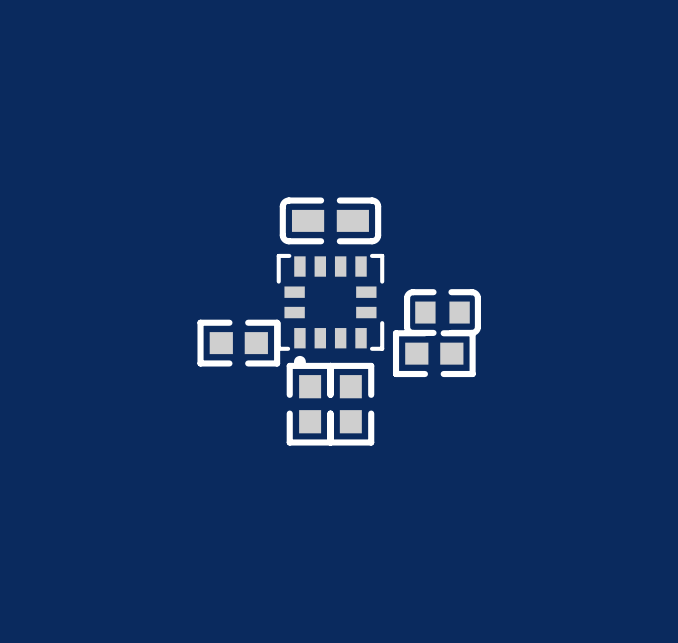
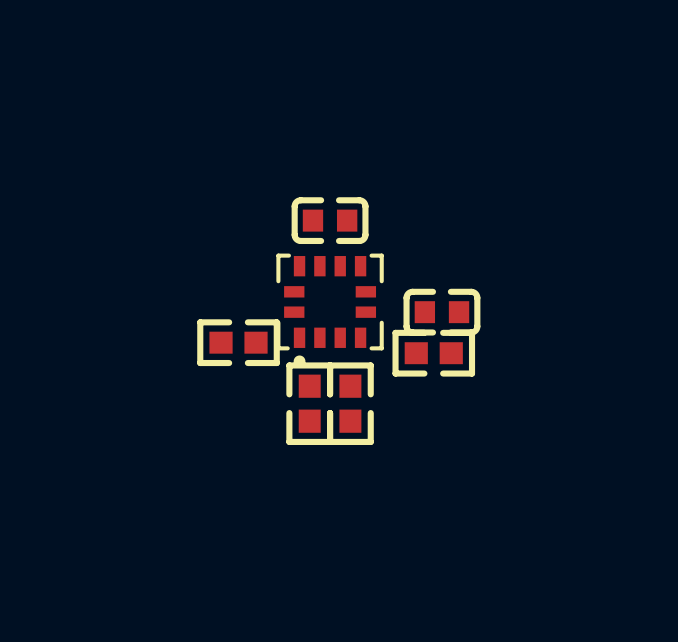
part footprint: [279, 197, 382, 245] -> [291, 197, 369, 245]

